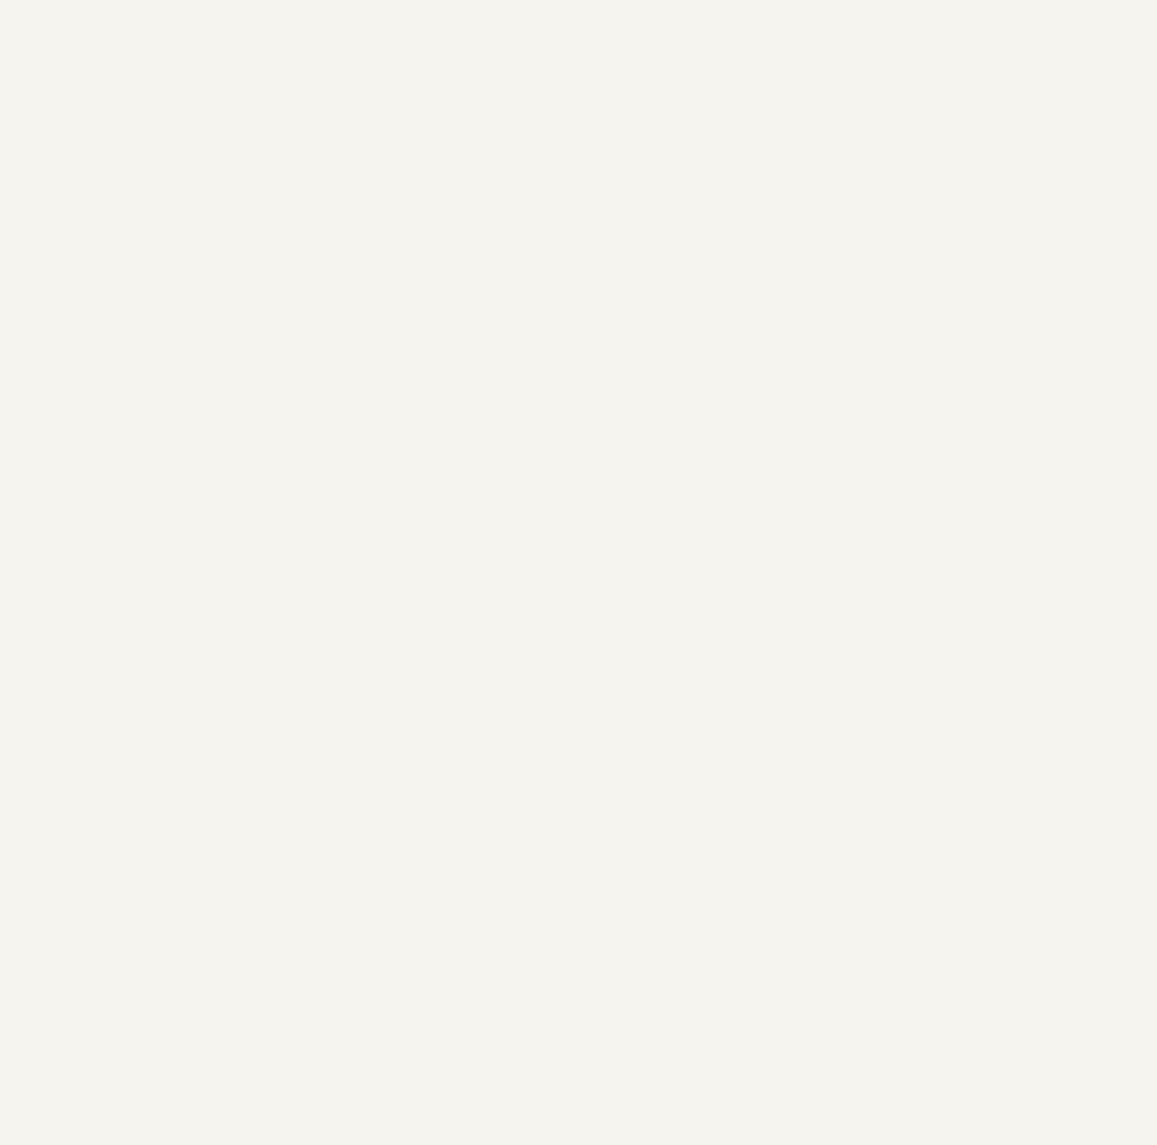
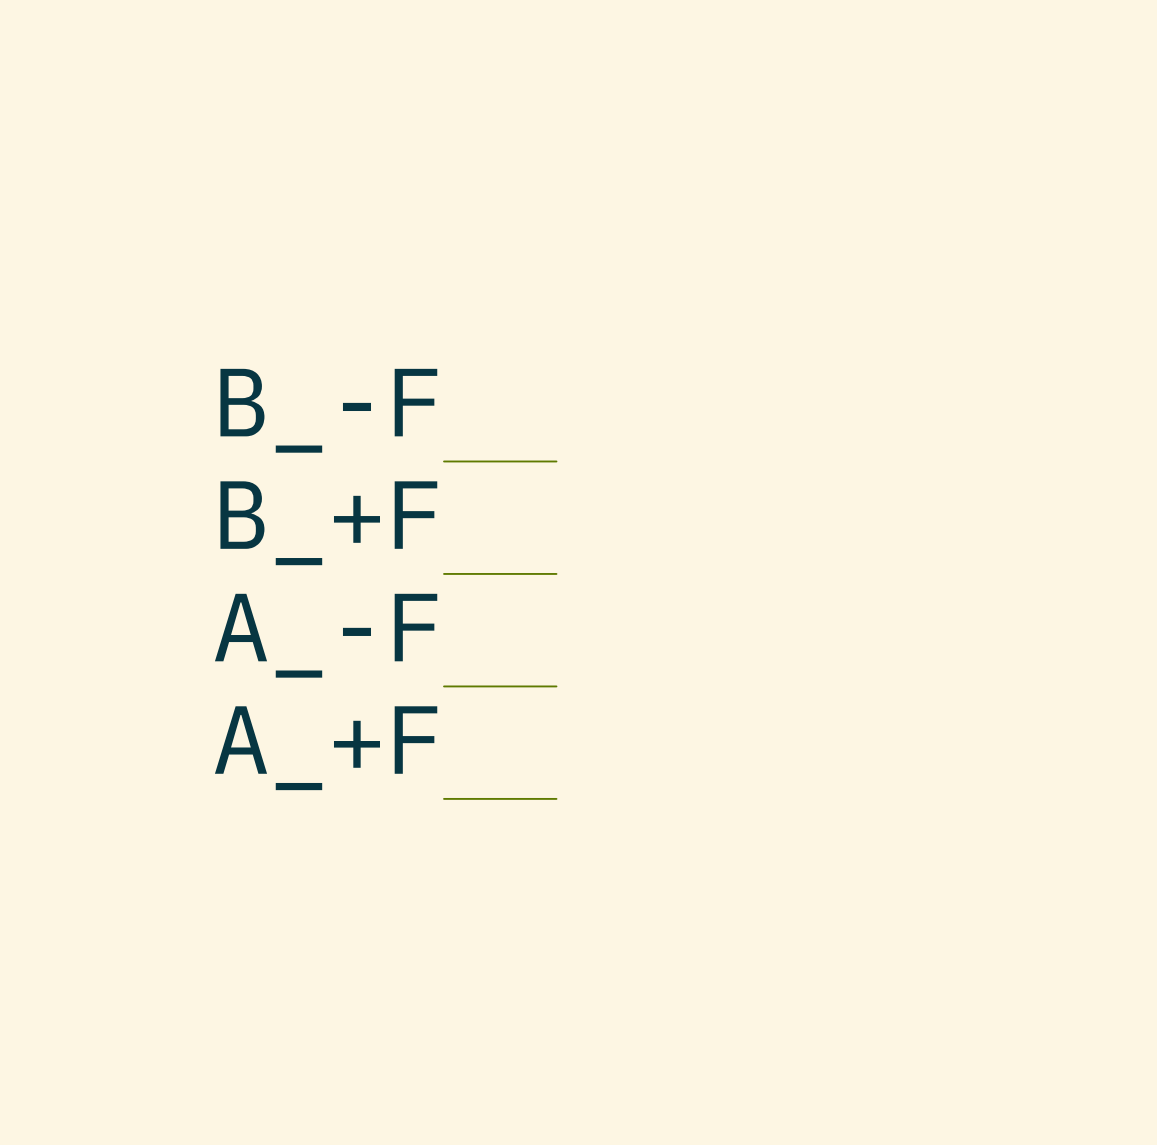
label: none -> B_-F (328, 410)
wire: none -> (444, 461) (556, 461)
label: none -> B_+F (328, 523)
wire: none -> (444, 573) (556, 573)
label: none -> A_-F (326, 635)
wire: none -> (444, 686) (556, 686)
label: none -> A_+F (326, 748)
wire: none -> (444, 798) (556, 798)

